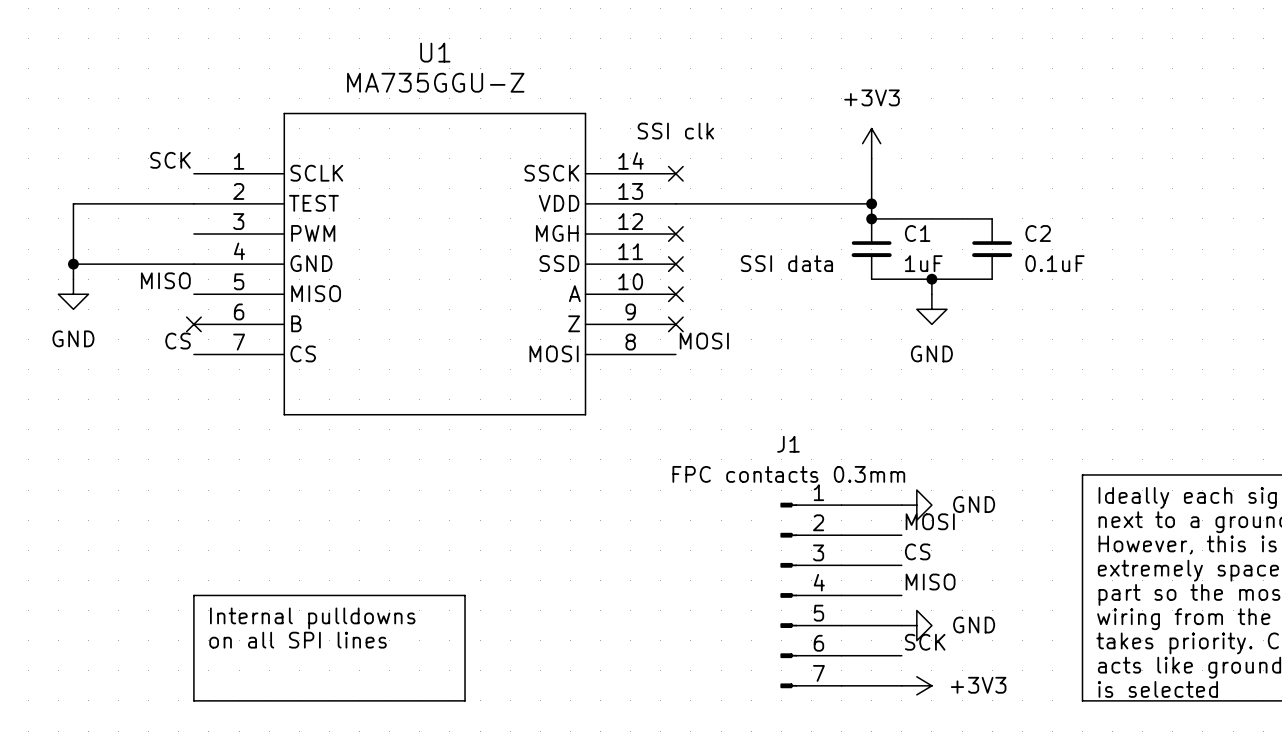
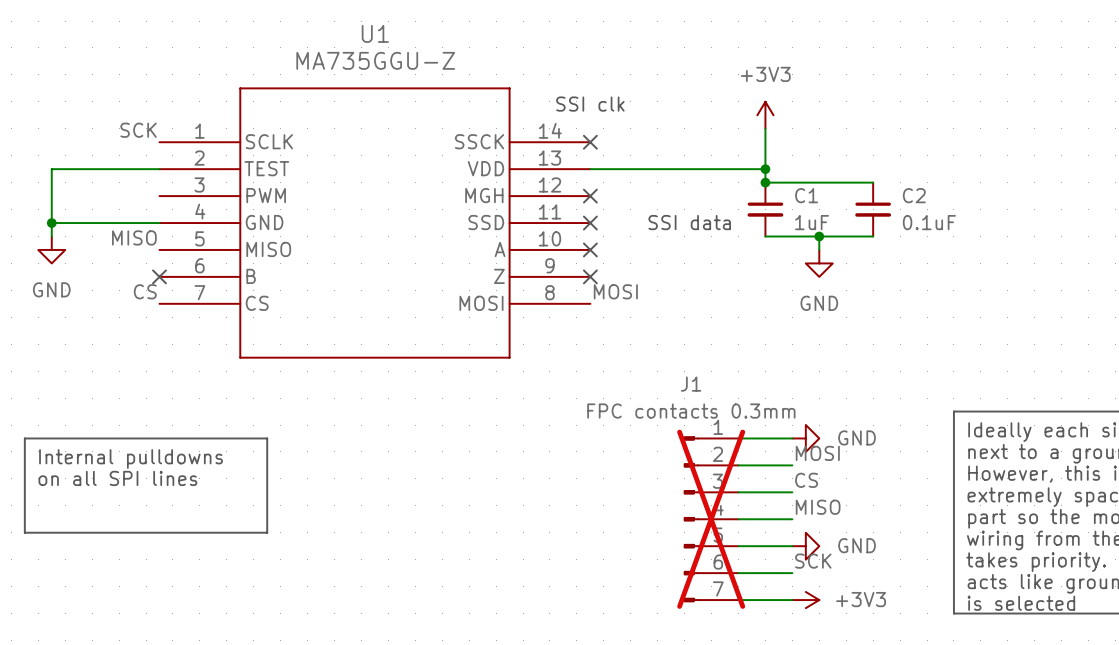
line: (193, 595) (465, 595) (465, 700) (193, 700) (193, 595) -> (24, 438) (267, 438) (267, 532) (24, 532) (24, 438)
J1 do-not-place cross: none -> (711, 519)
text position: Internal pulldowns (312, 618) -> Internal pulldowns (131, 459)
text position: on all SPI lines (298, 640) -> on all SPI lines (117, 478)

